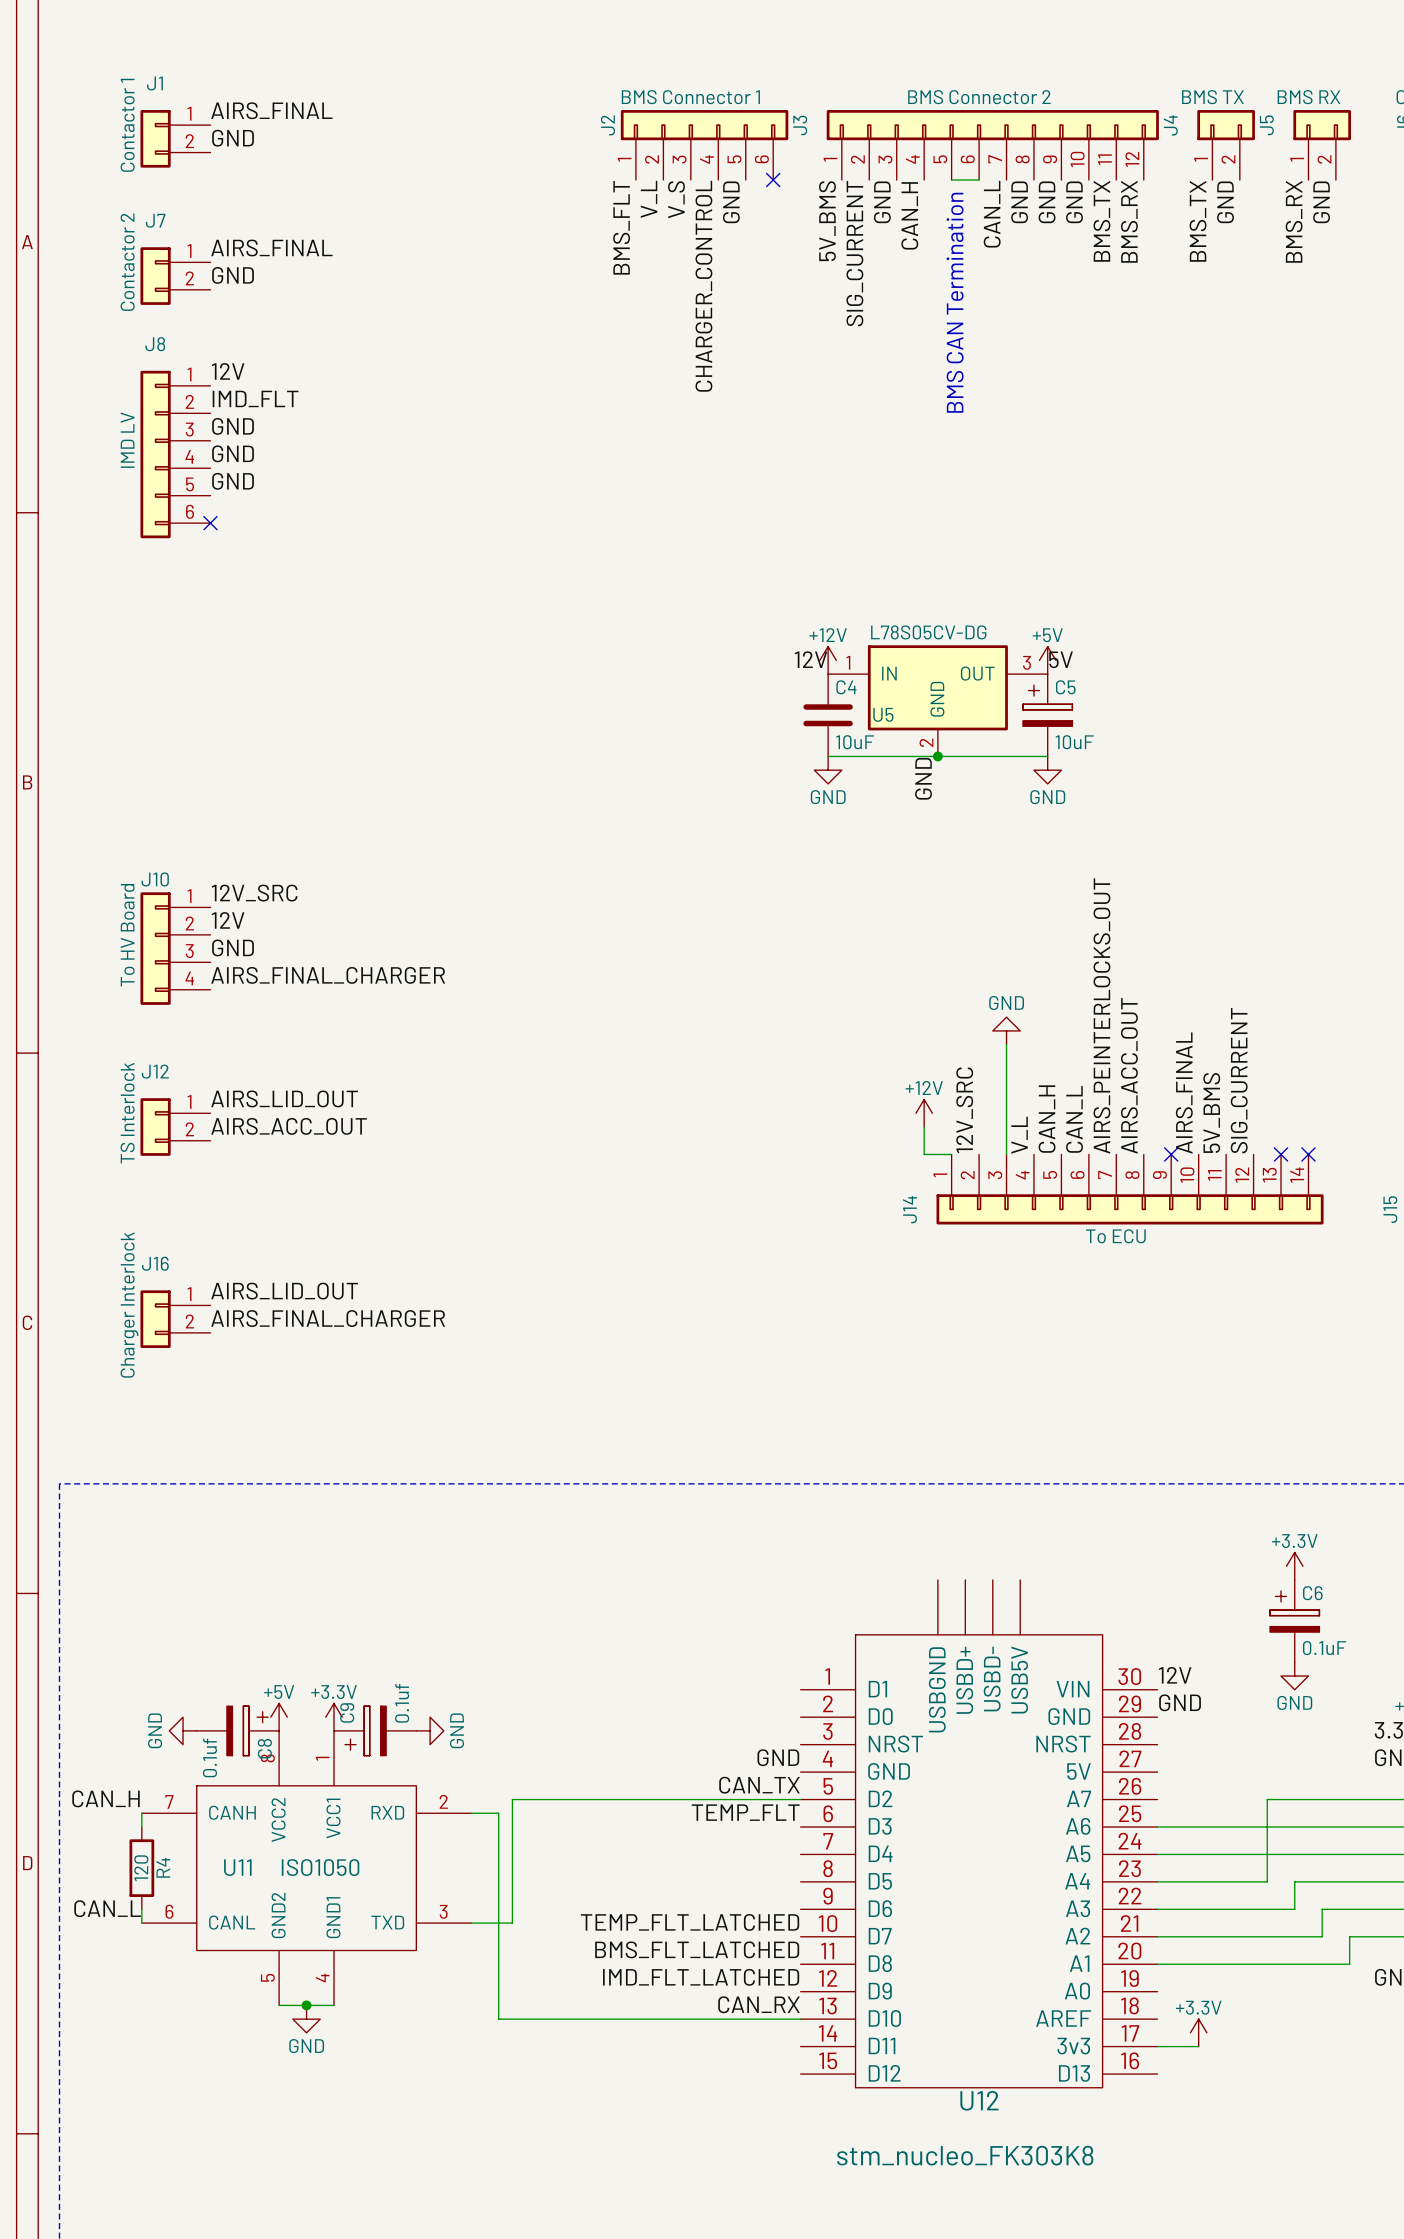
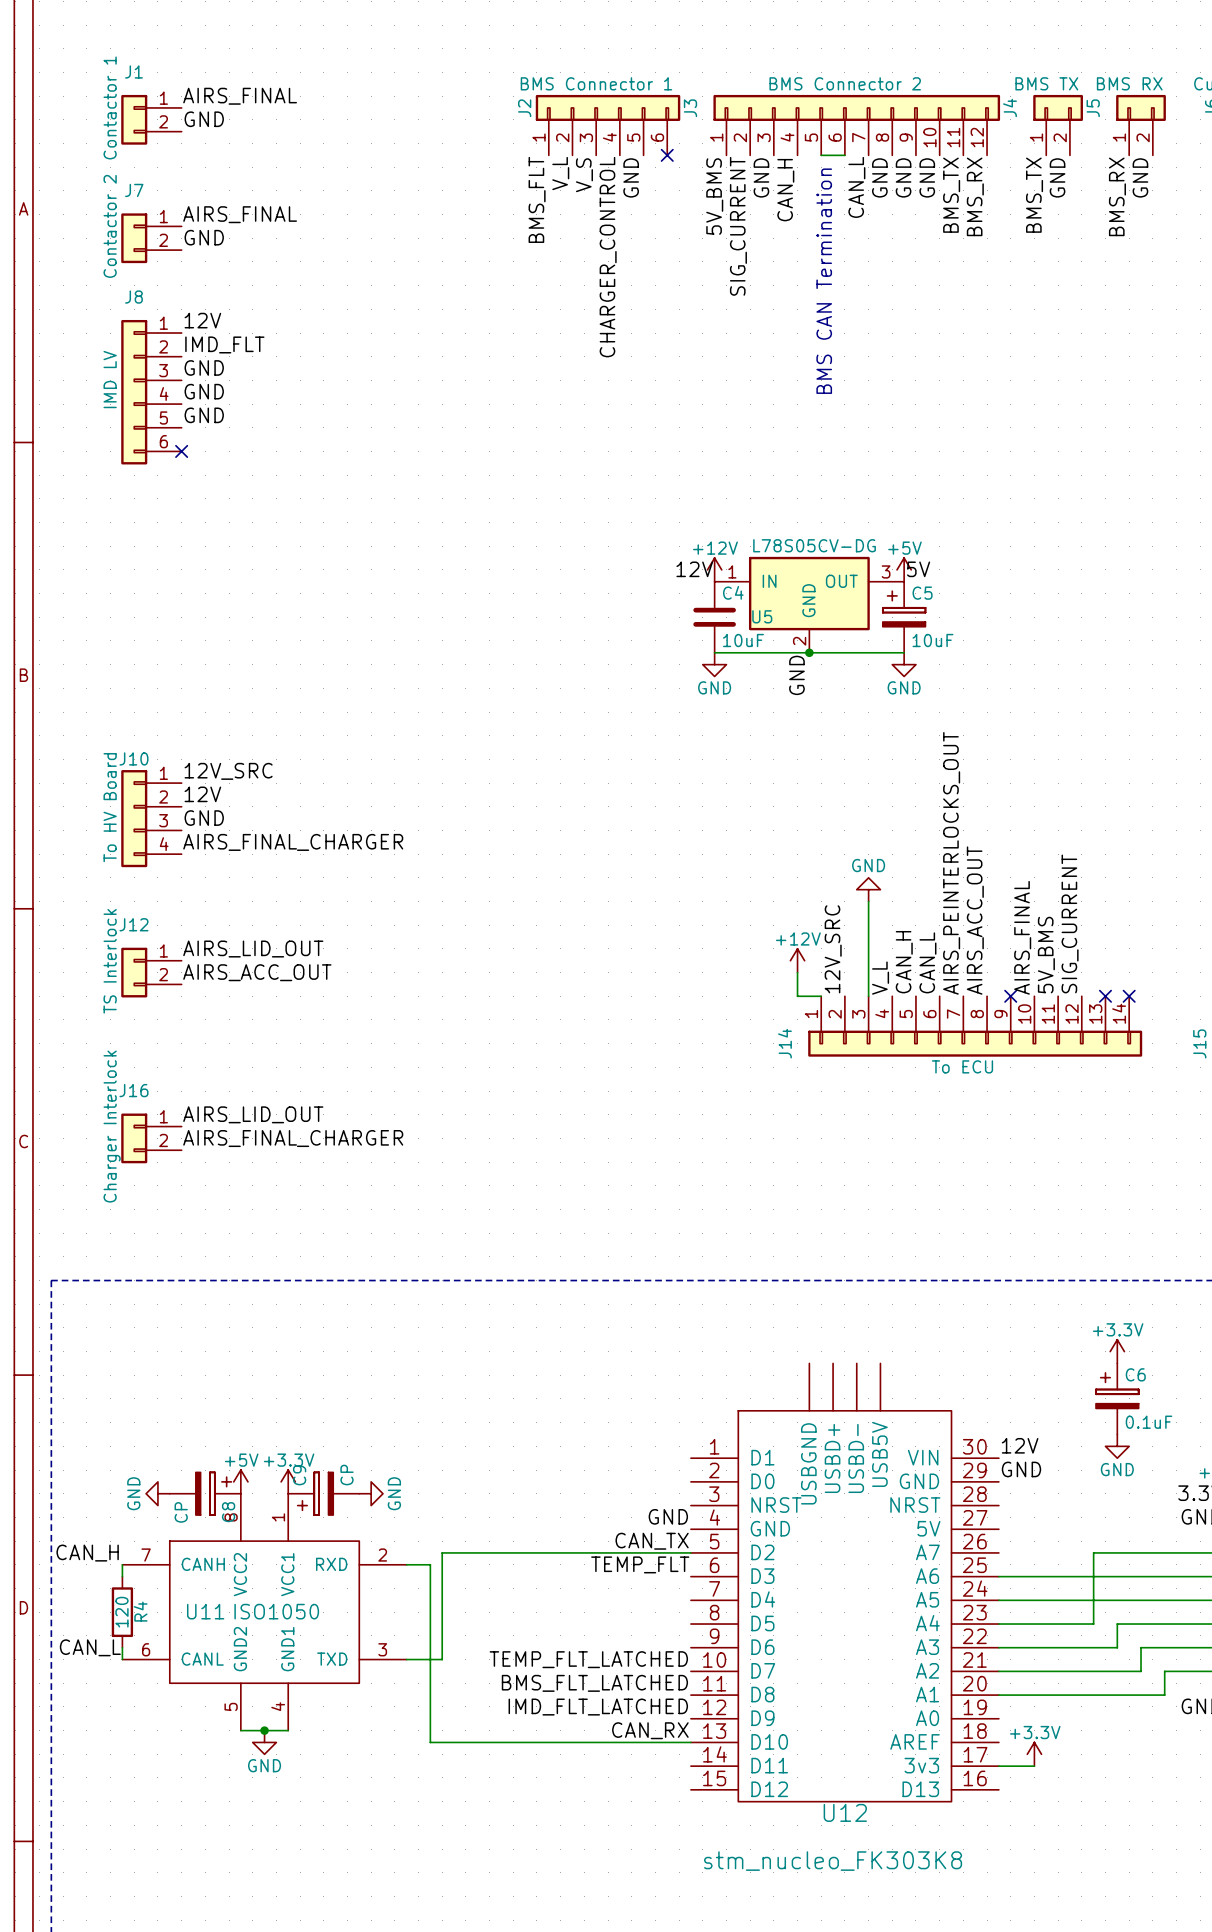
C9 value: 0.1uf (402, 1703) -> CP (347, 1475)
C8 value: 0.1uf (209, 1757) -> CP (181, 1512)

